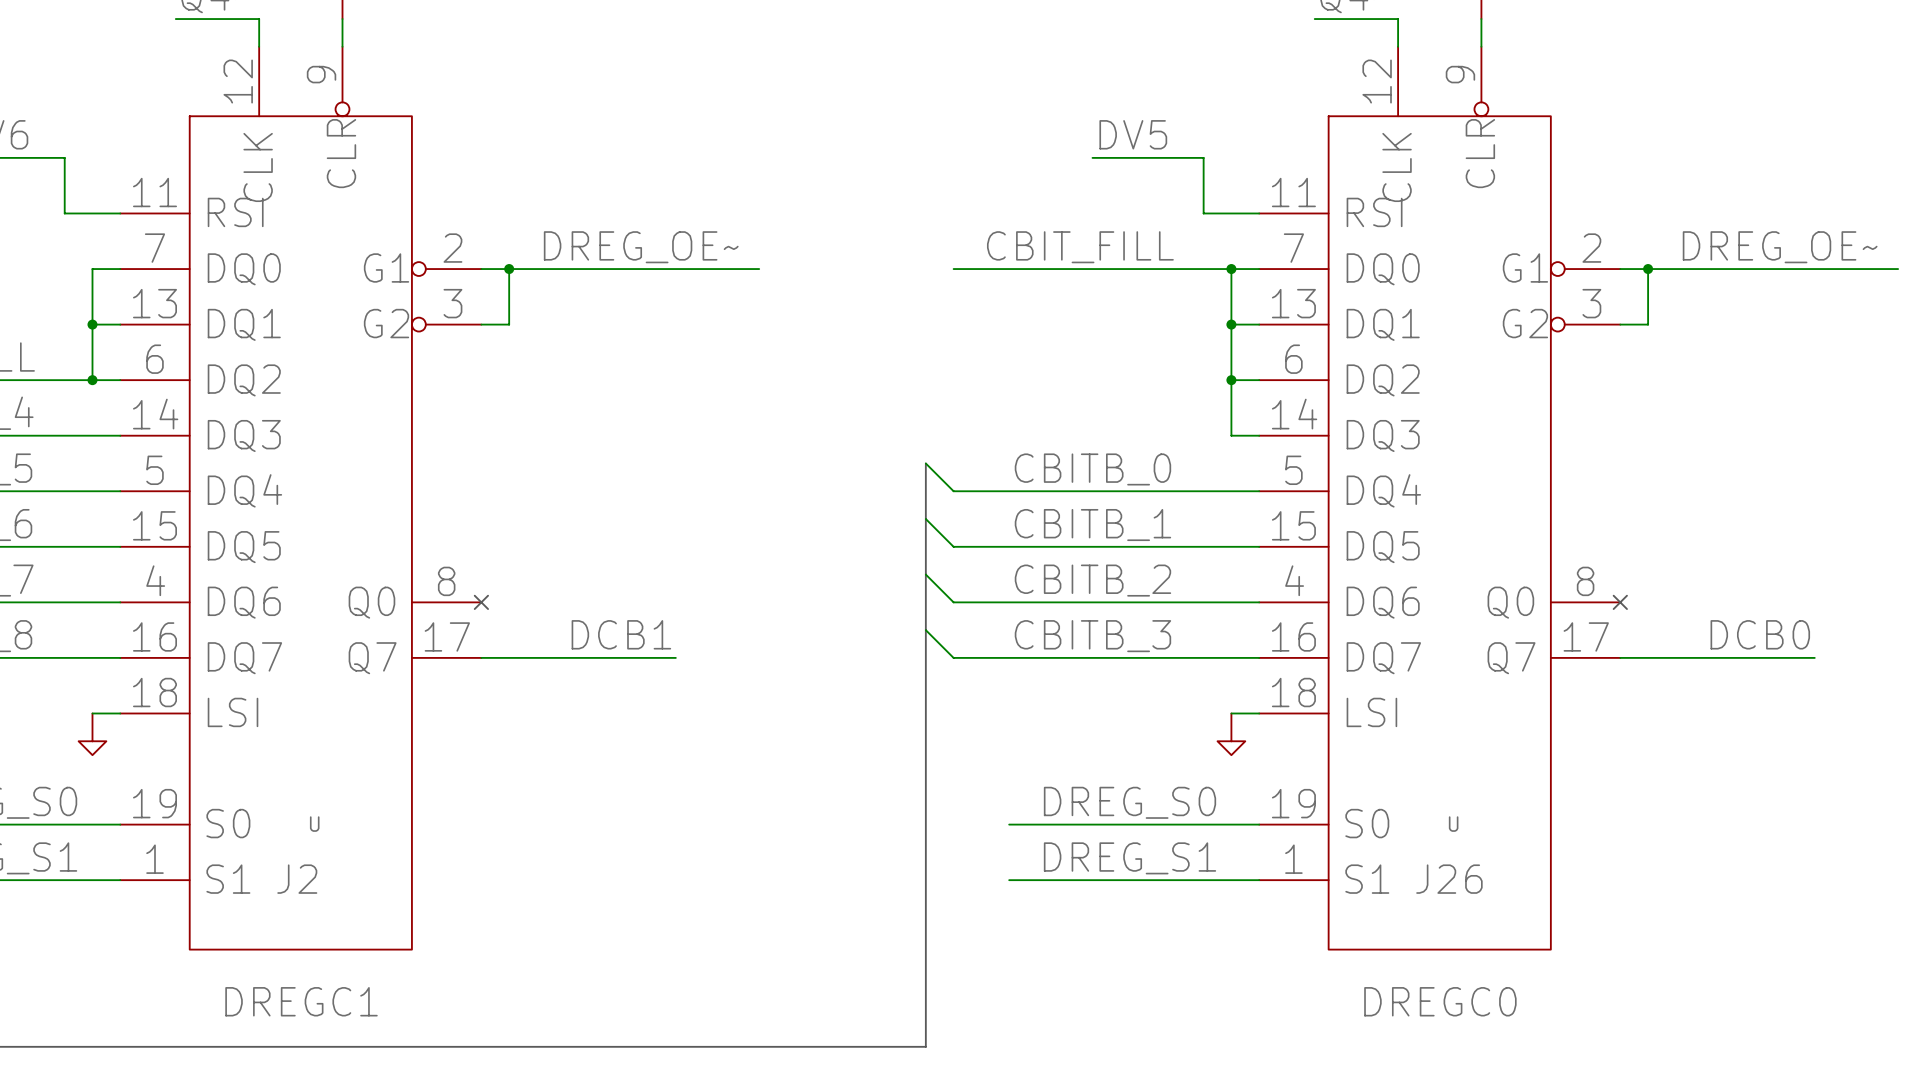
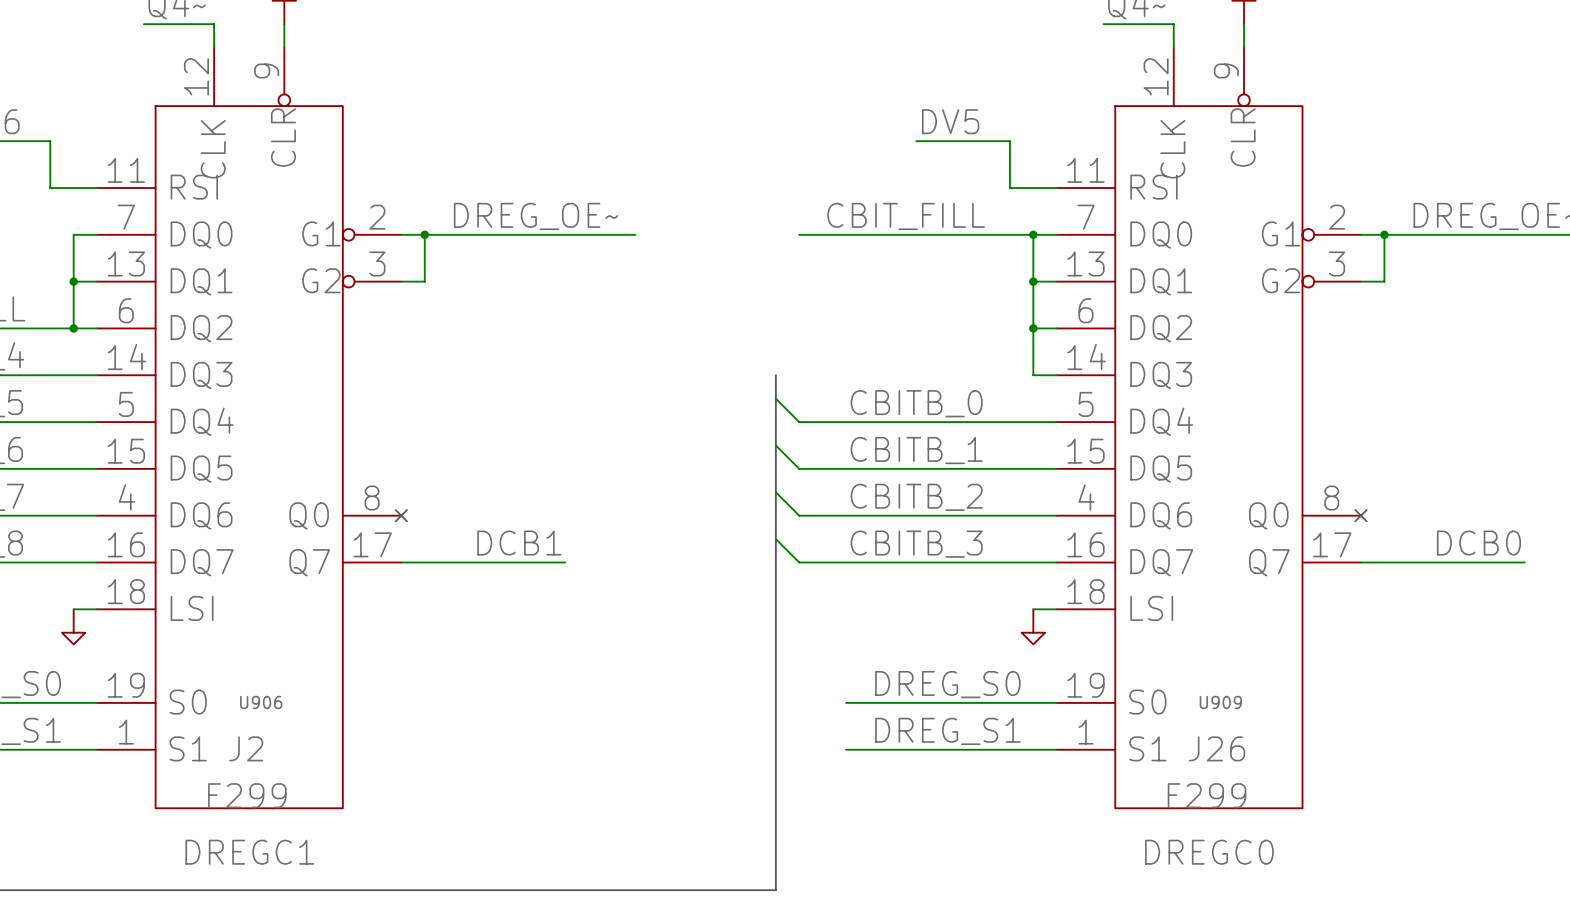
bus: none -> (775, 375) (775, 398)
U name: U (314, 824) -> U906 (261, 702)
U name: U (1453, 824) -> U909 (1220, 702)
U value: none -> F299 (247, 795)
U value: none -> F299 (1207, 795)

